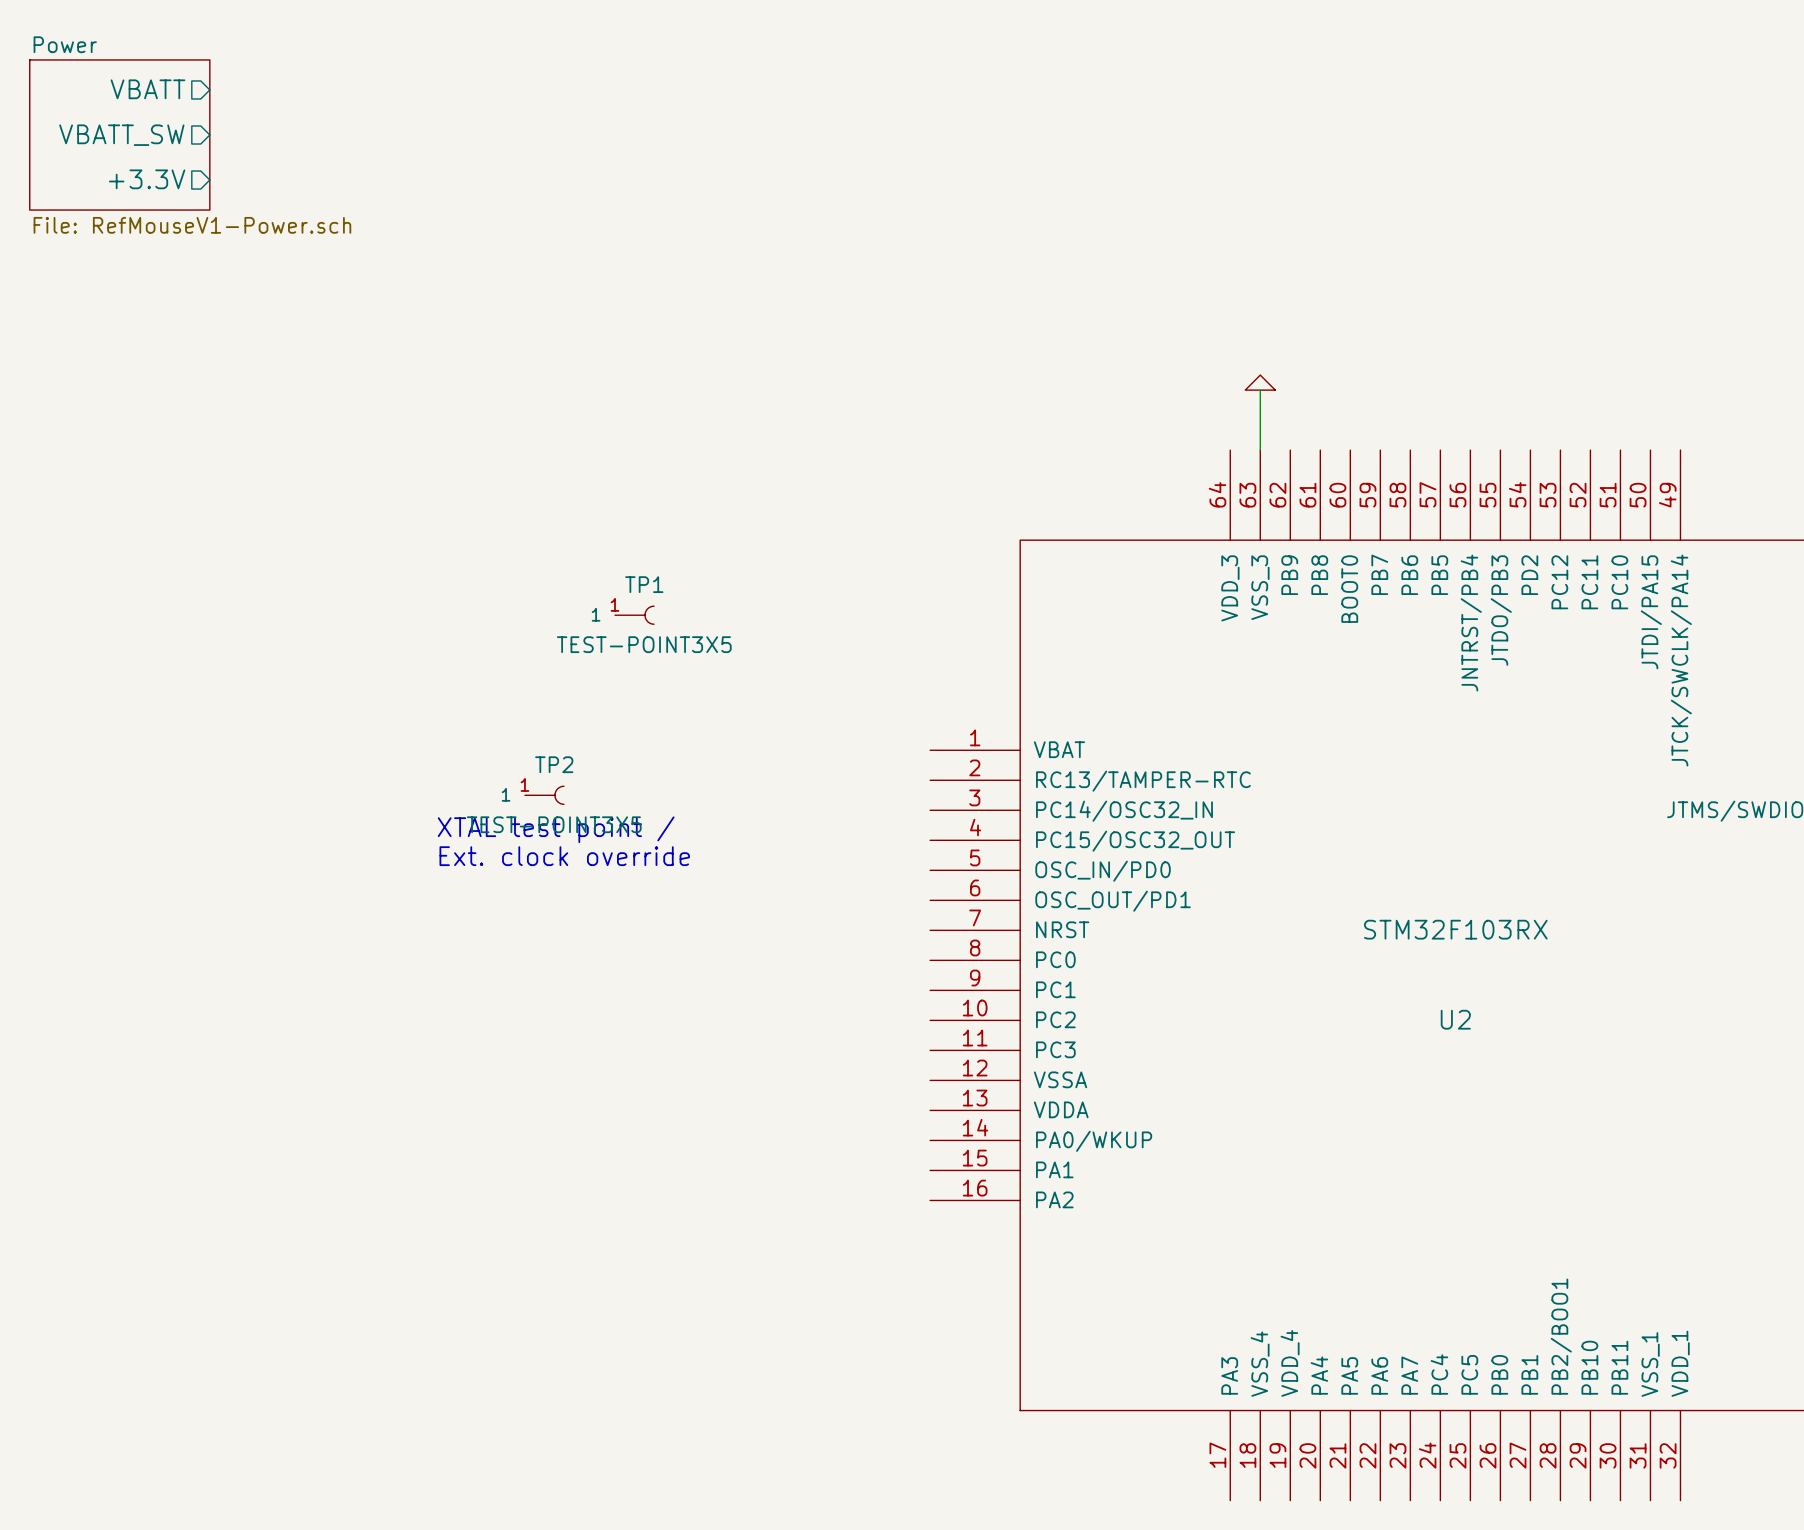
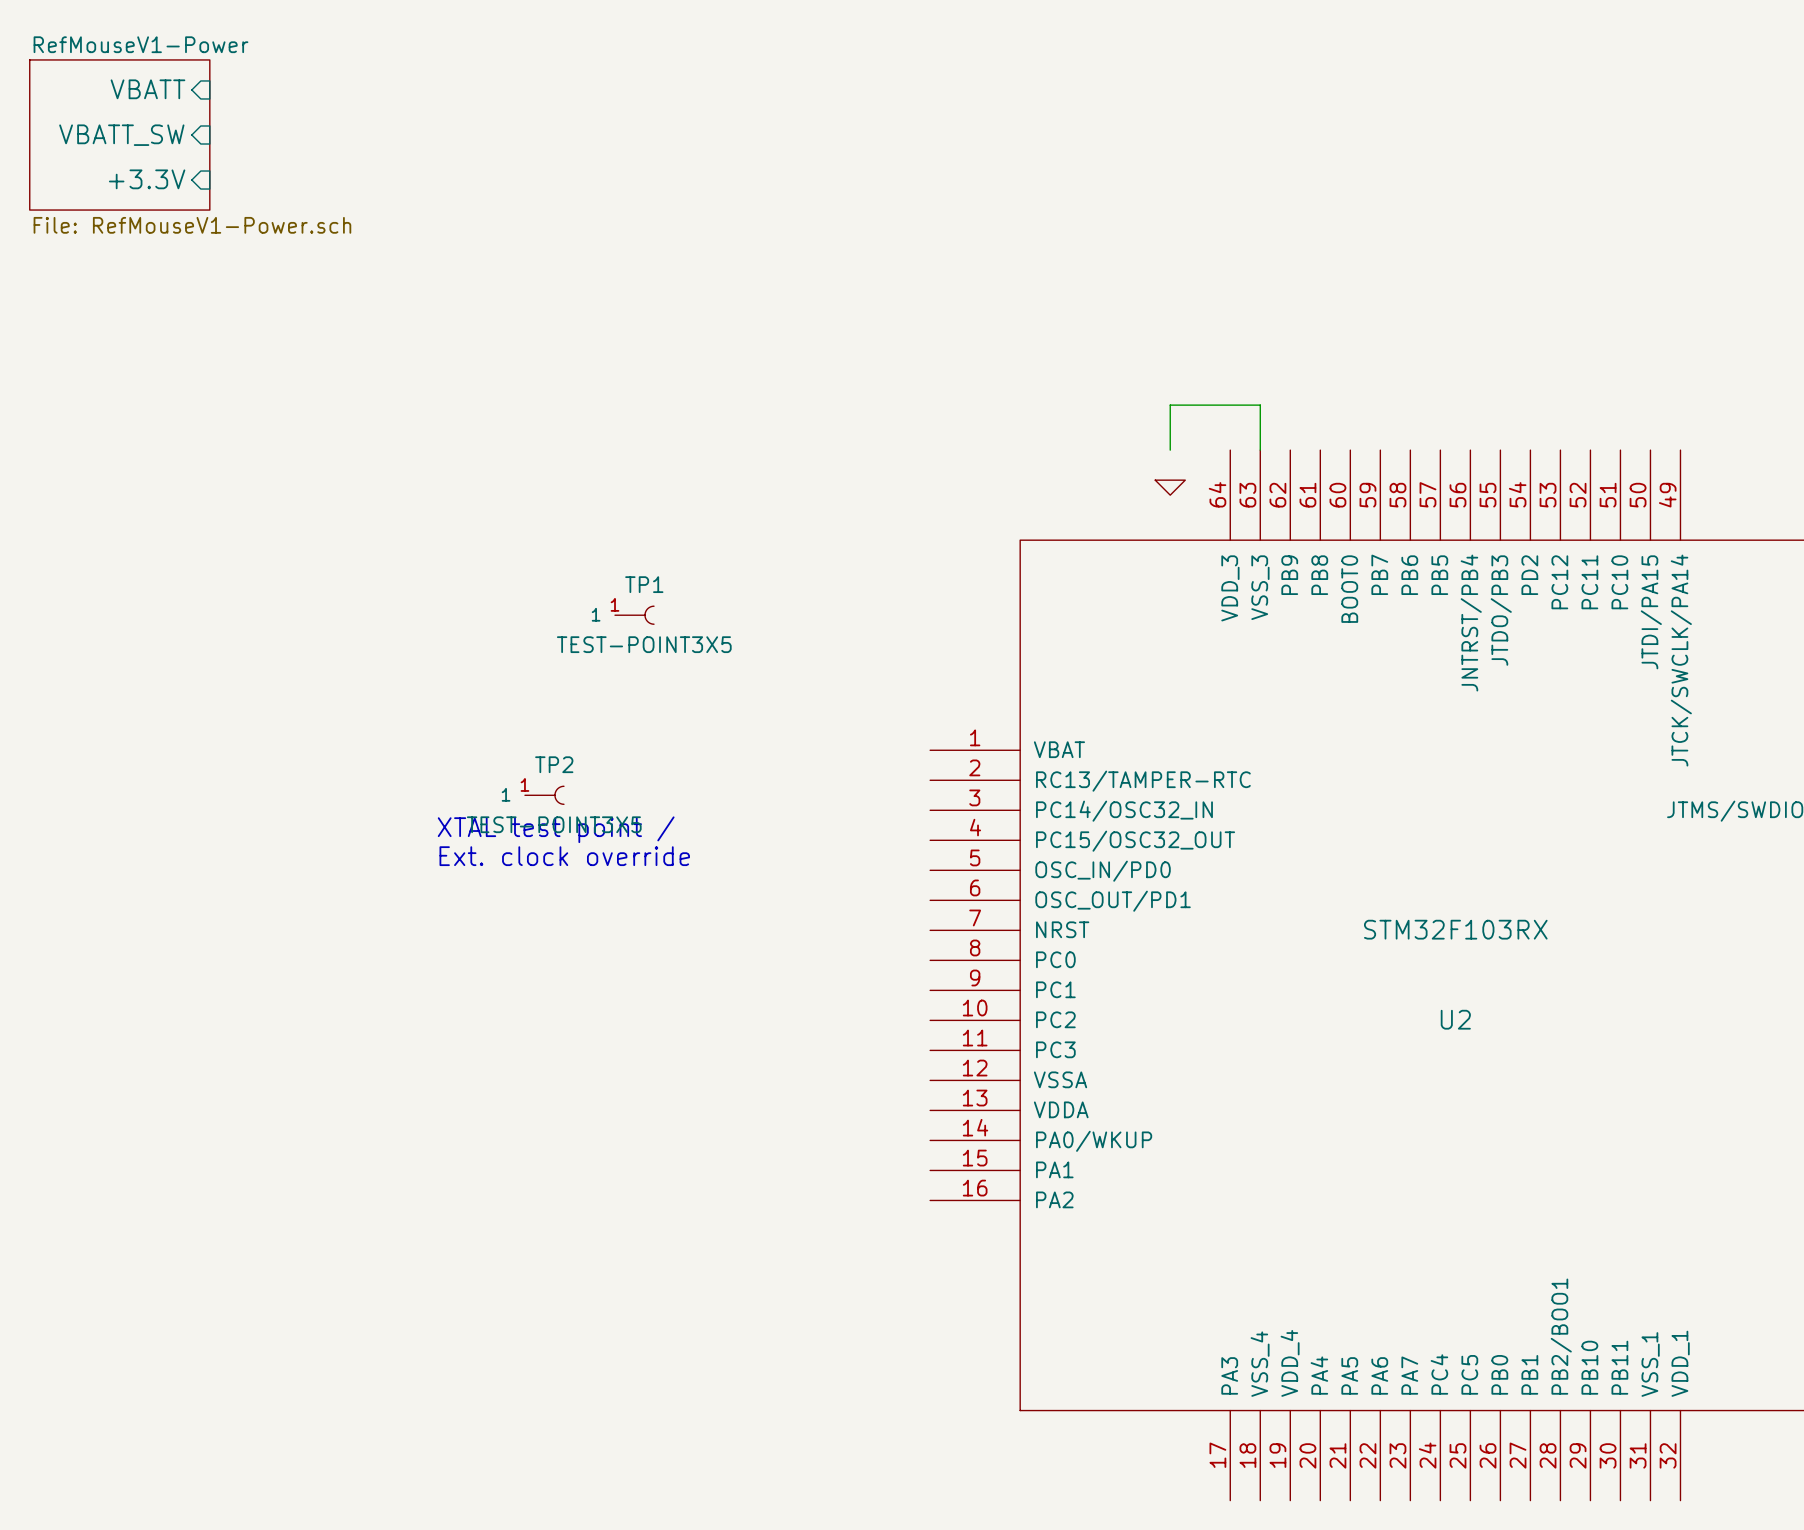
sheet Power name: Power (65, 44) -> RefMouseV1-Power (140, 44)
sheet pin shape: output (147, 89) -> input (147, 89)
sheet pin shape: output (121, 135) -> input (121, 135)
sheet pin shape: output (147, 179) -> input (147, 179)
power symbol rotation: 0° (1260, 382) -> 180° (1170, 487)
power symbol position: (1260, 382) -> (1170, 487)
wire: (1260, 390) (1260, 405) -> (1170, 450) (1170, 405) (1260, 405)

